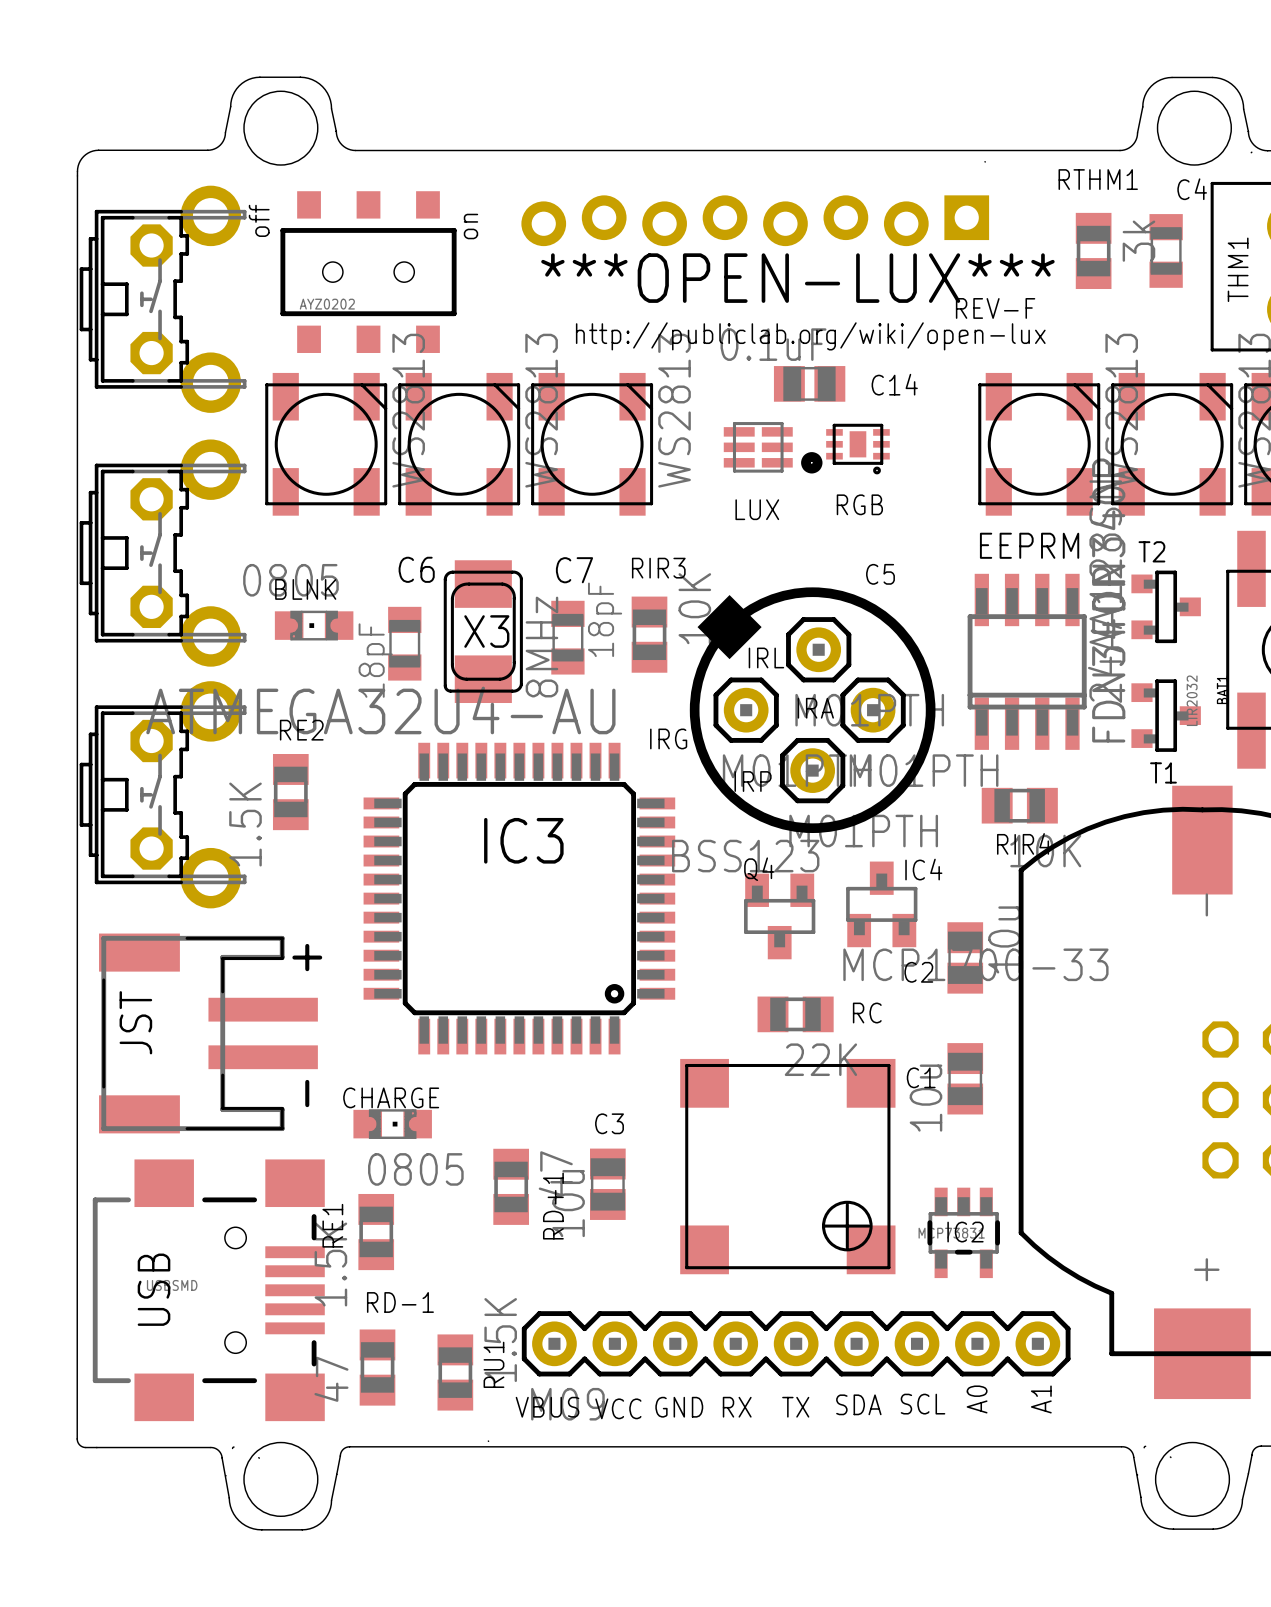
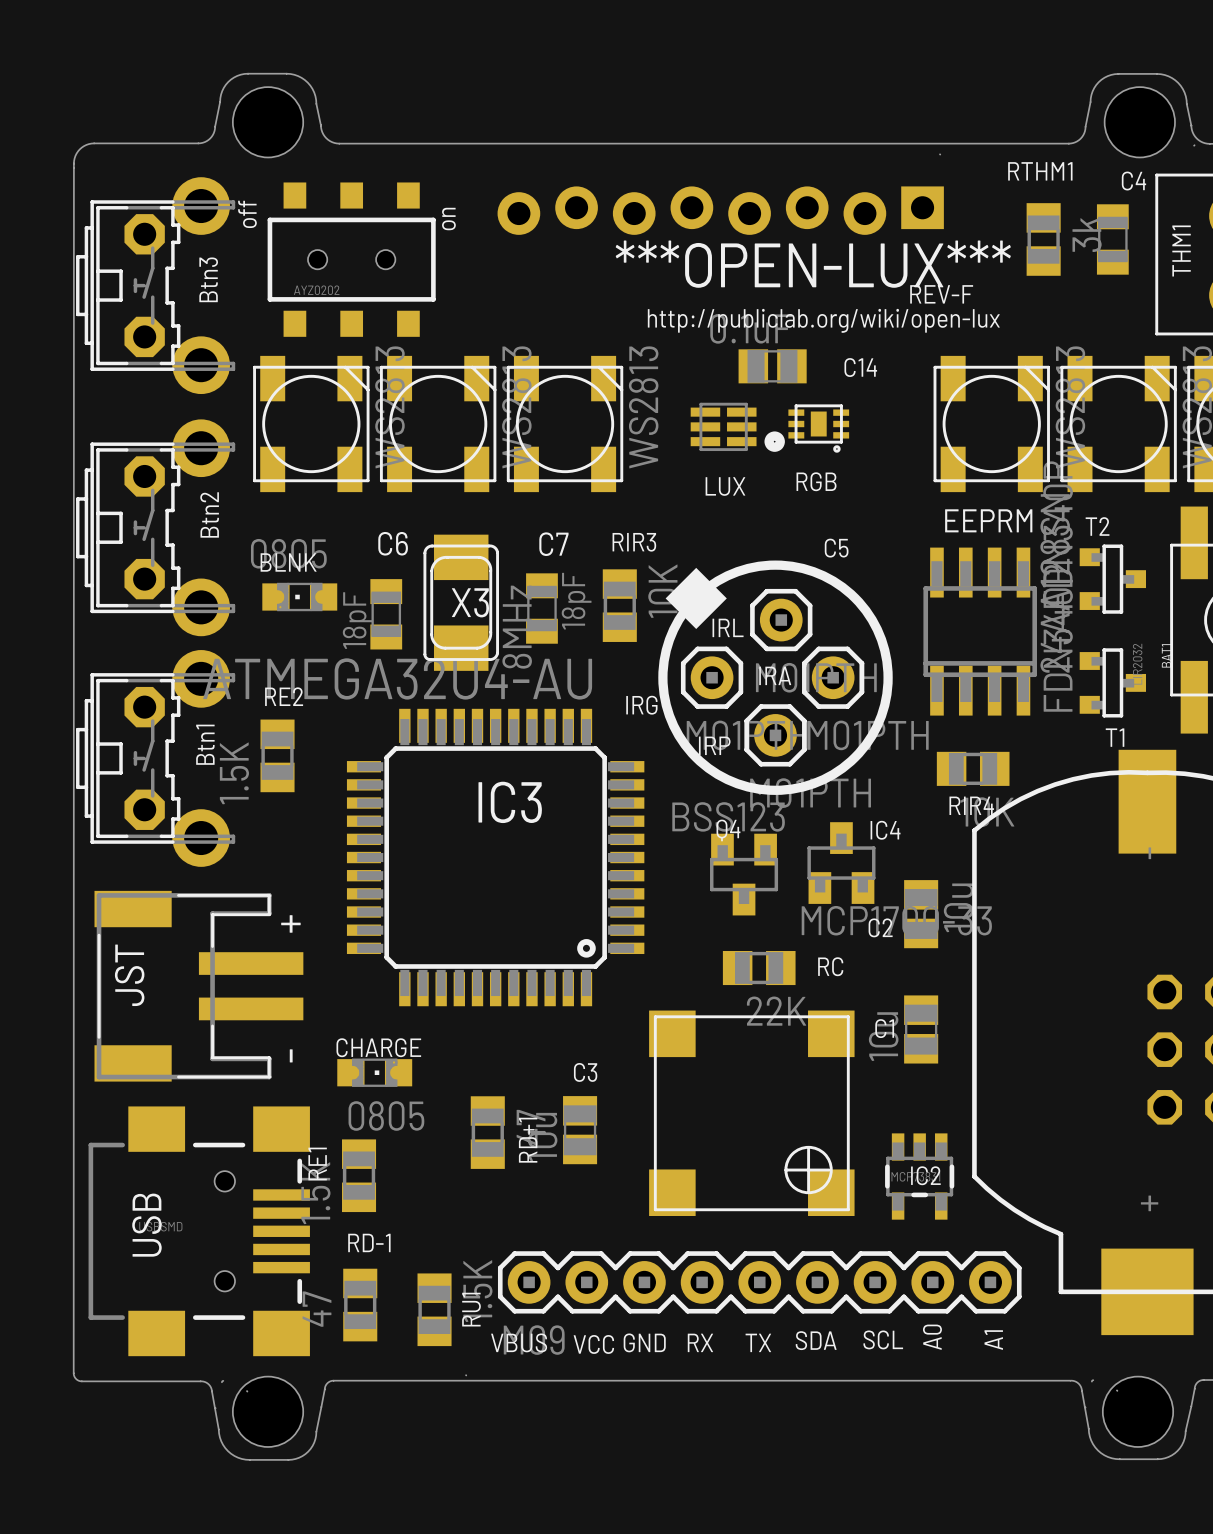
text: none -> Btn3 (208, 279)
text: none -> Btn2 (209, 514)
text: none -> Btn1 (205, 744)

